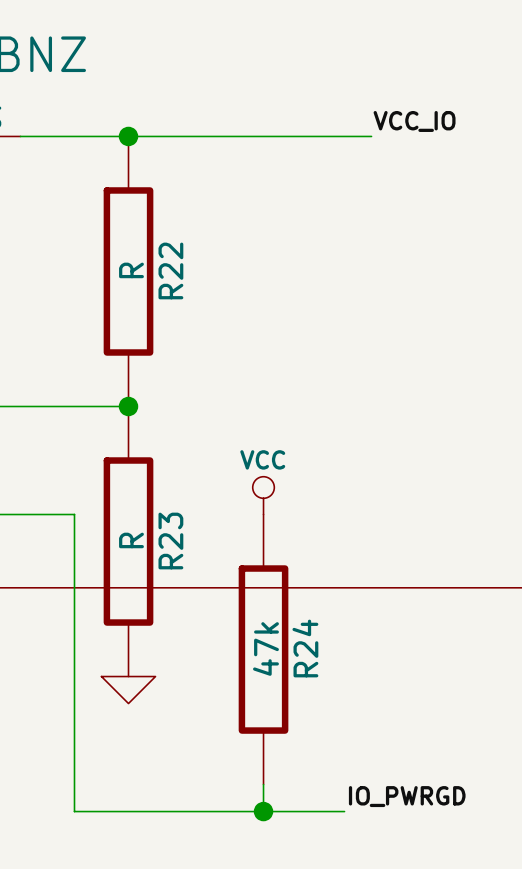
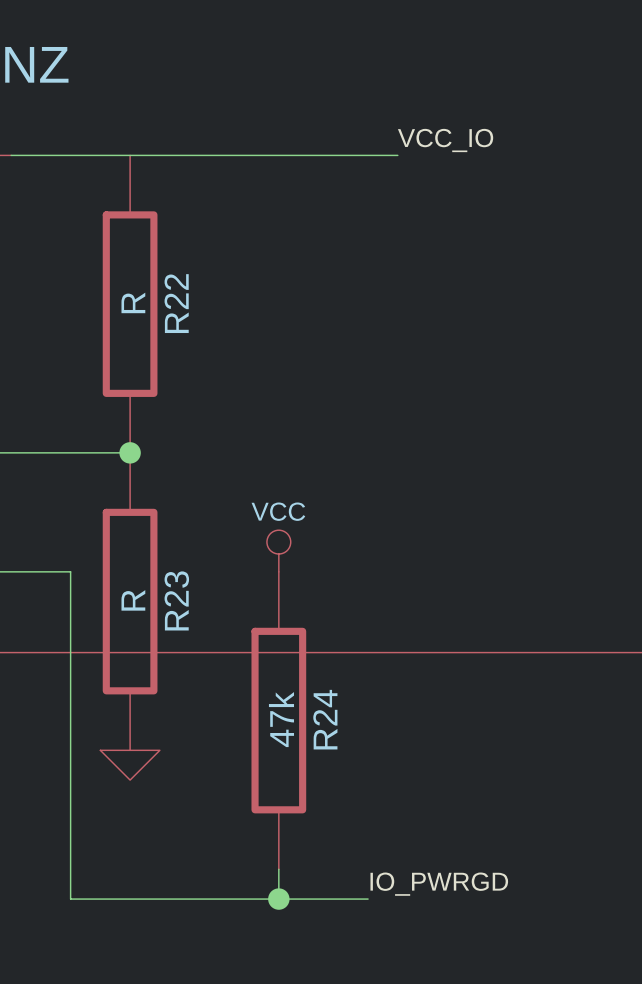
junction: (128, 136) -> none

